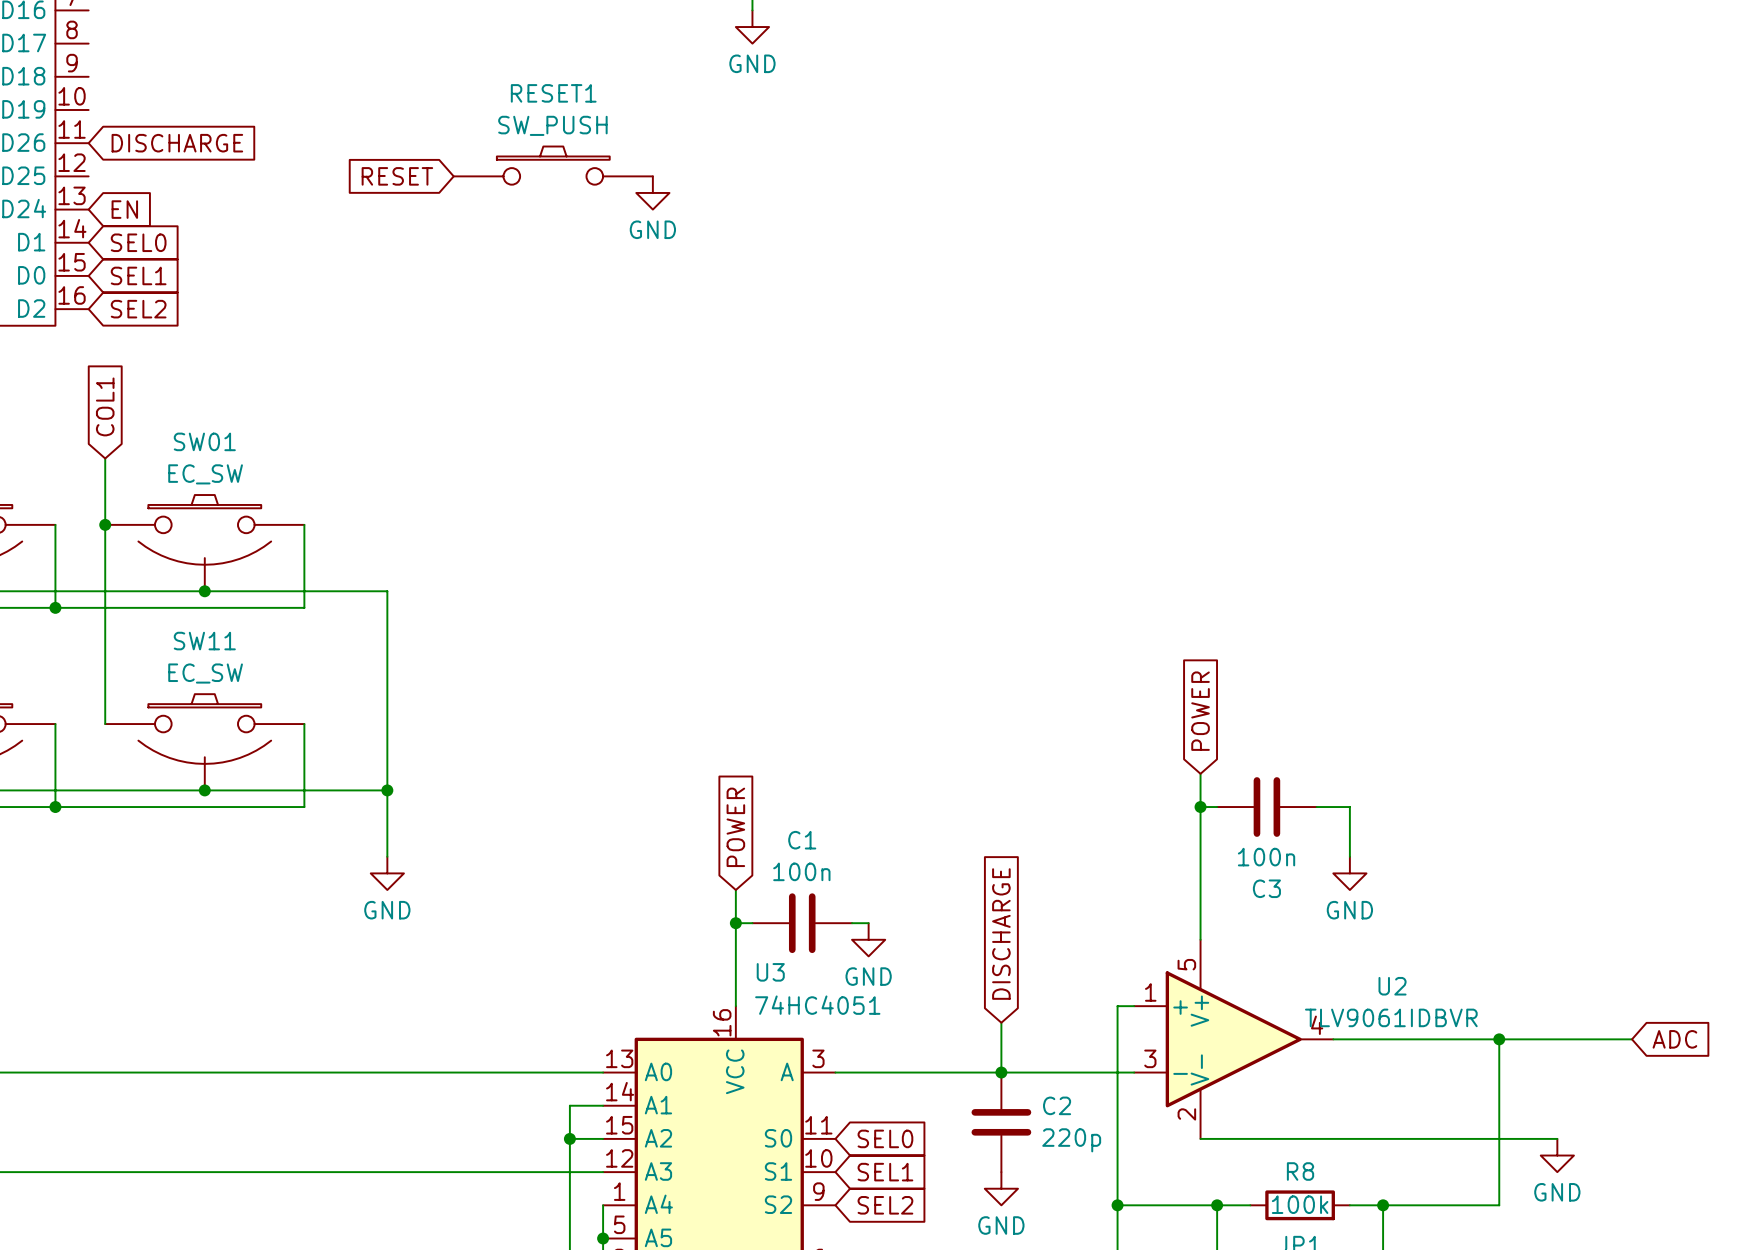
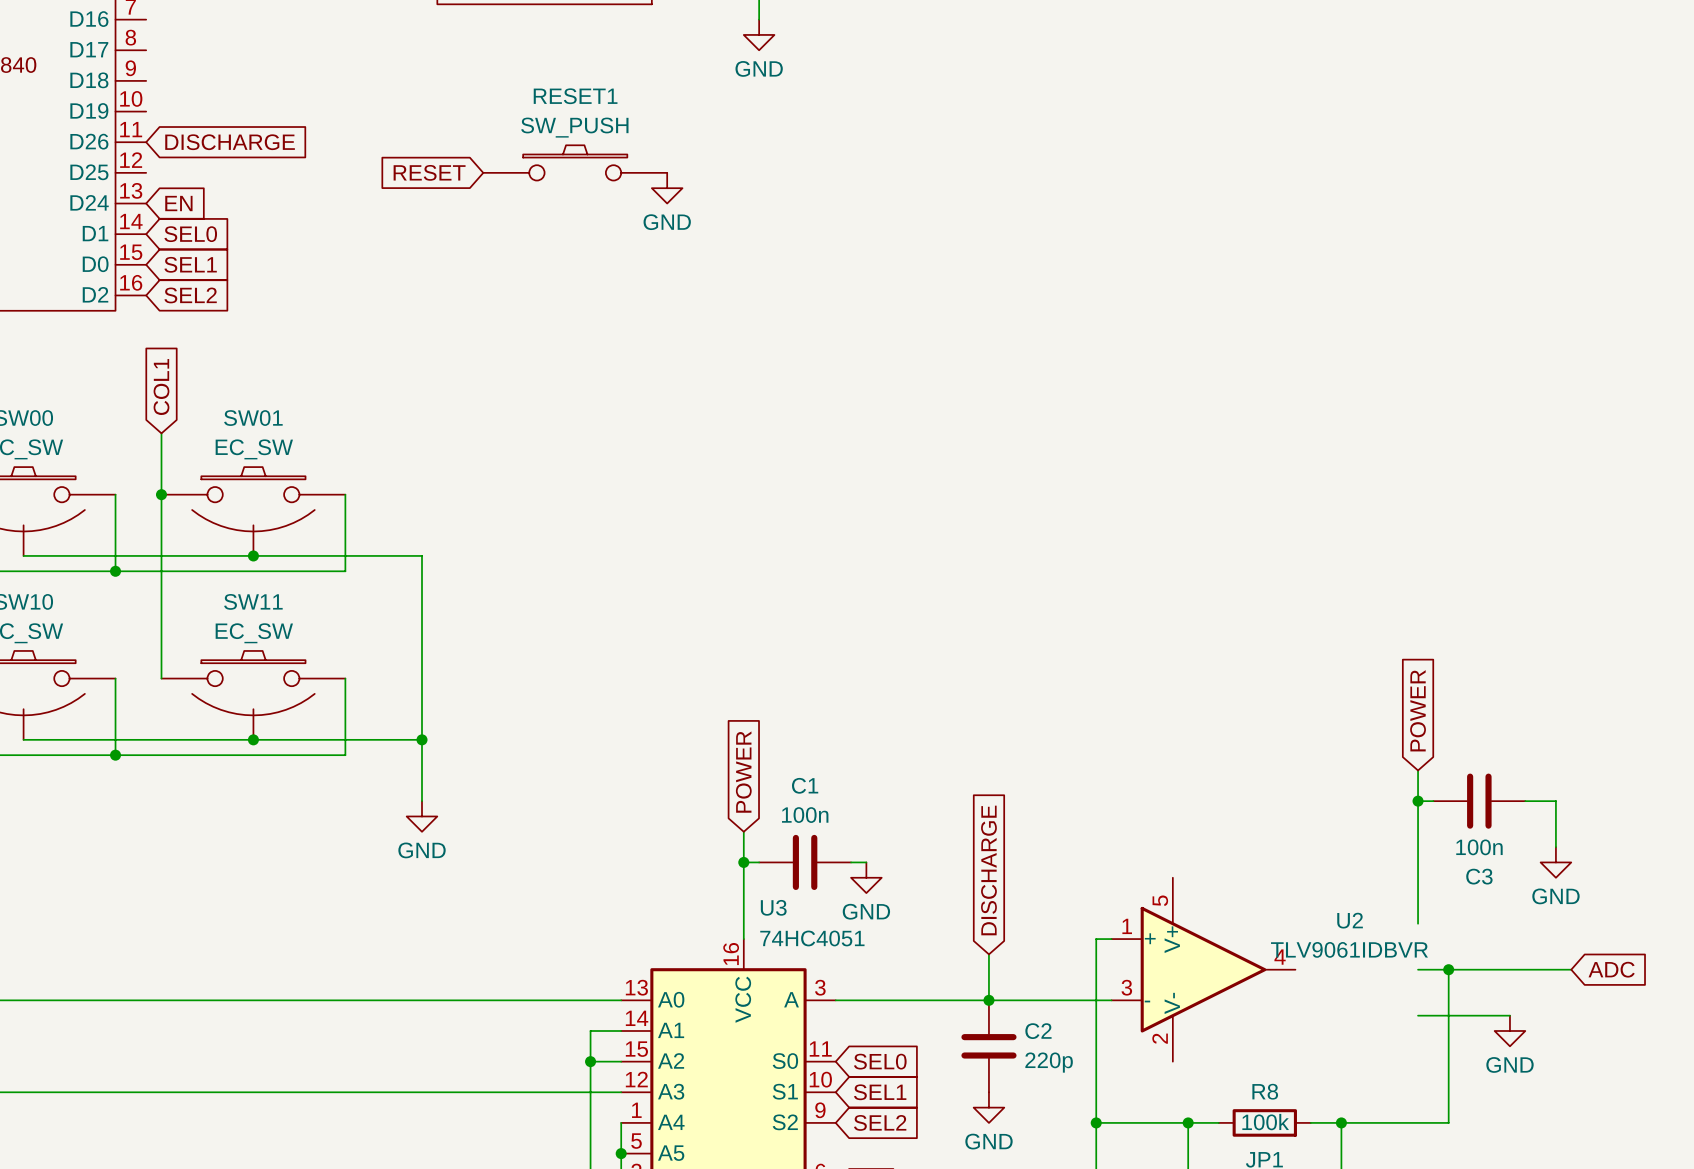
global label position: POWER (1200, 711) -> POWER (1418, 710)
wire: (1200, 773) (1200, 939) -> (1418, 770) (1418, 923)
wire: (1200, 807) (1217, 807) -> (1418, 801) (1433, 801)
junction: (1200, 807) -> none
C3 position: (1266, 807) -> (1479, 801)
wire: (1316, 807) (1349, 807) (1349, 856) -> (1525, 801) (1555, 801) (1555, 847)
junction: none -> (1418, 801)
power symbol: GND (1349, 873) -> none
power symbol: none -> GND (1555, 862)
wire: (1333, 1039) (1466, 1039) -> none
wire: none -> (1418, 1015) (1509, 1015)
wire: (1200, 1138) (1557, 1138) -> none
power symbol position: GND (1557, 1155) -> GND (1509, 1030)

